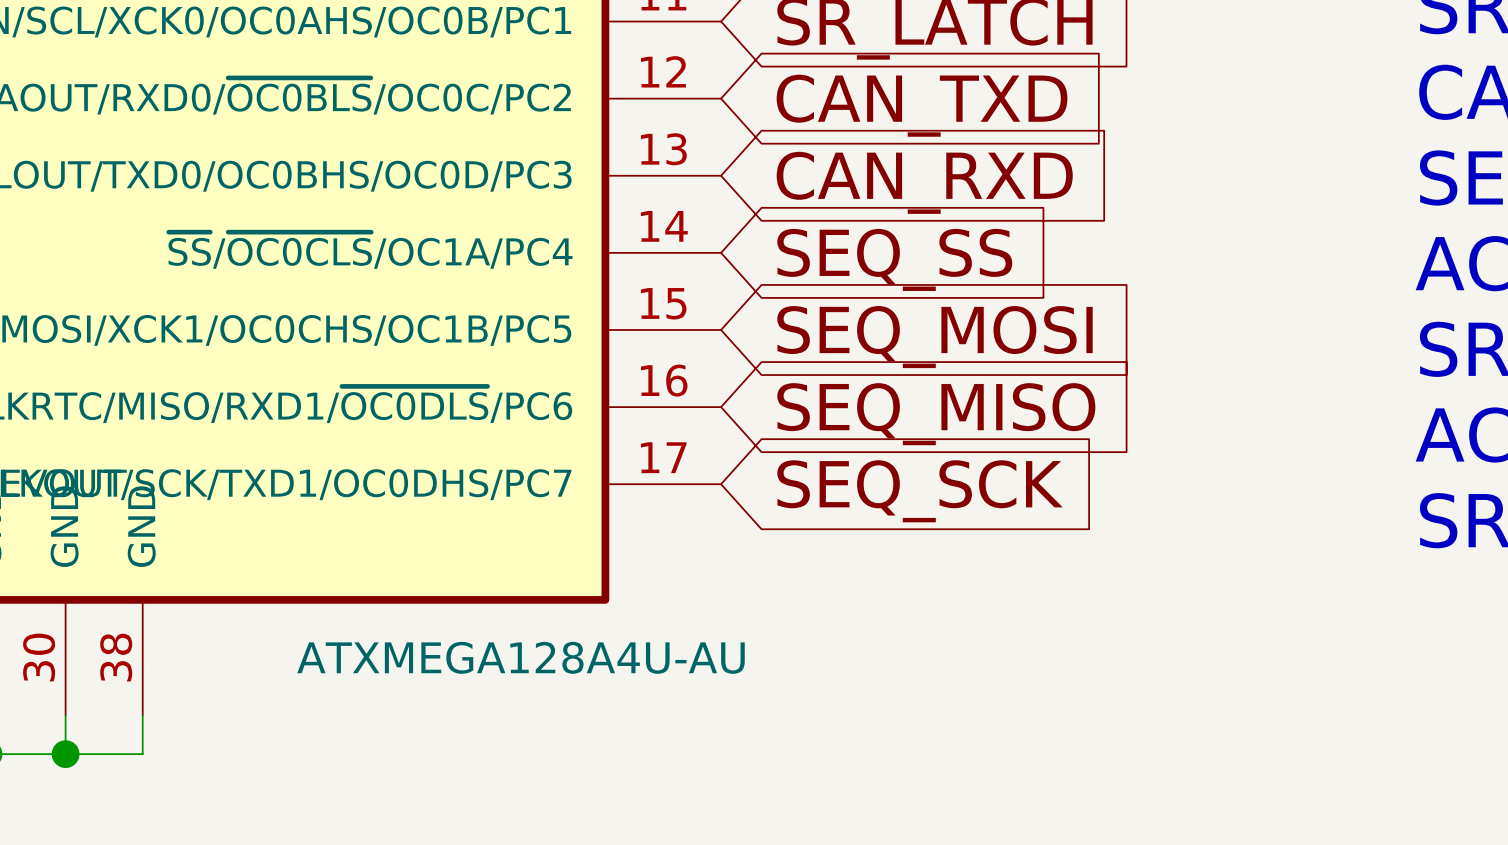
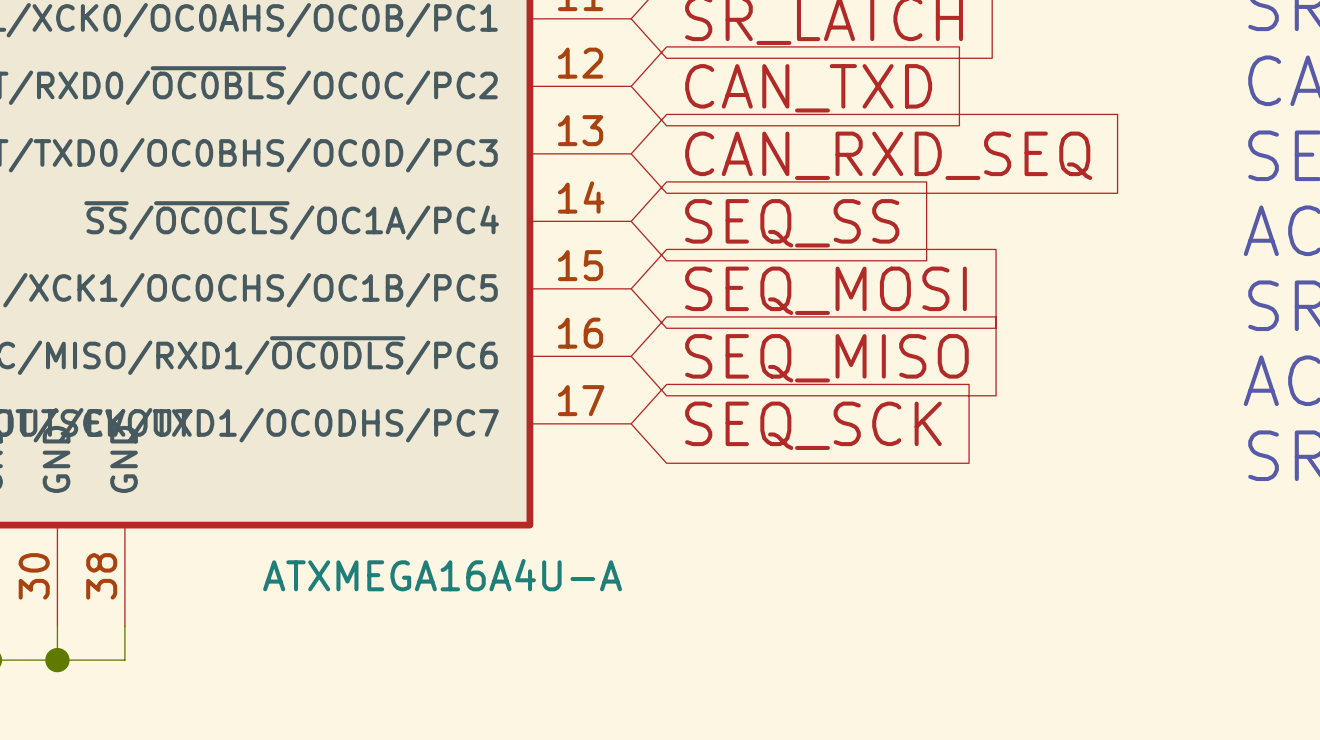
global label: CAN_RXD (924, 182) -> CAN_RXD_SEQ (888, 155)
part value: ATXMEGA128A4U-AU (521, 657) -> ATXMEGA16A4U-A (442, 575)

